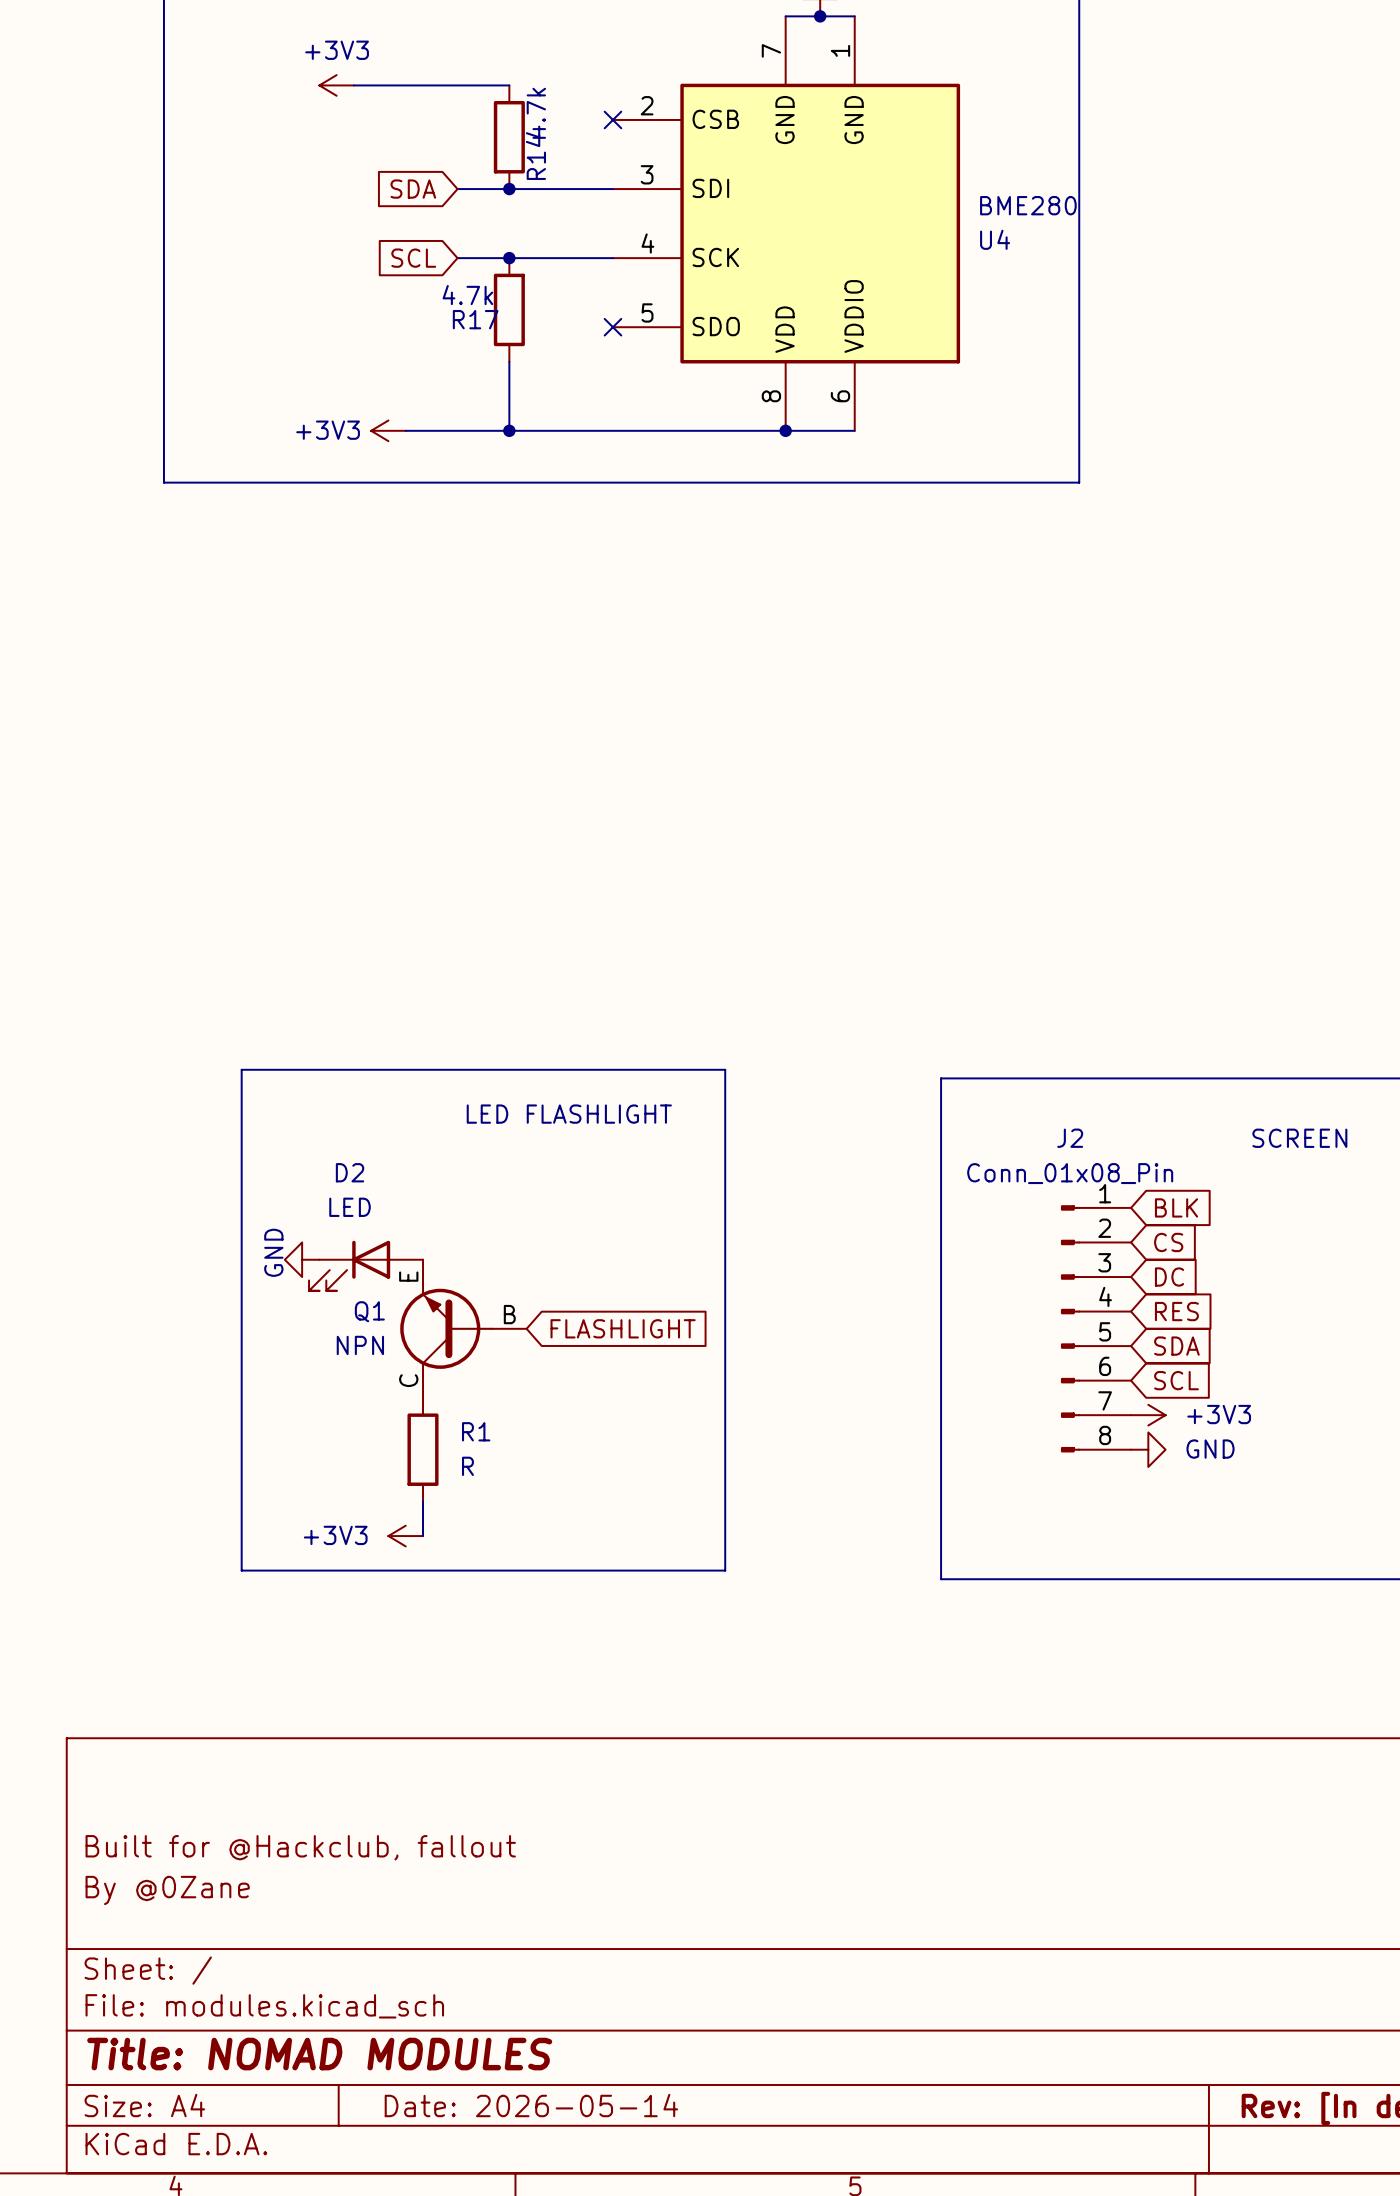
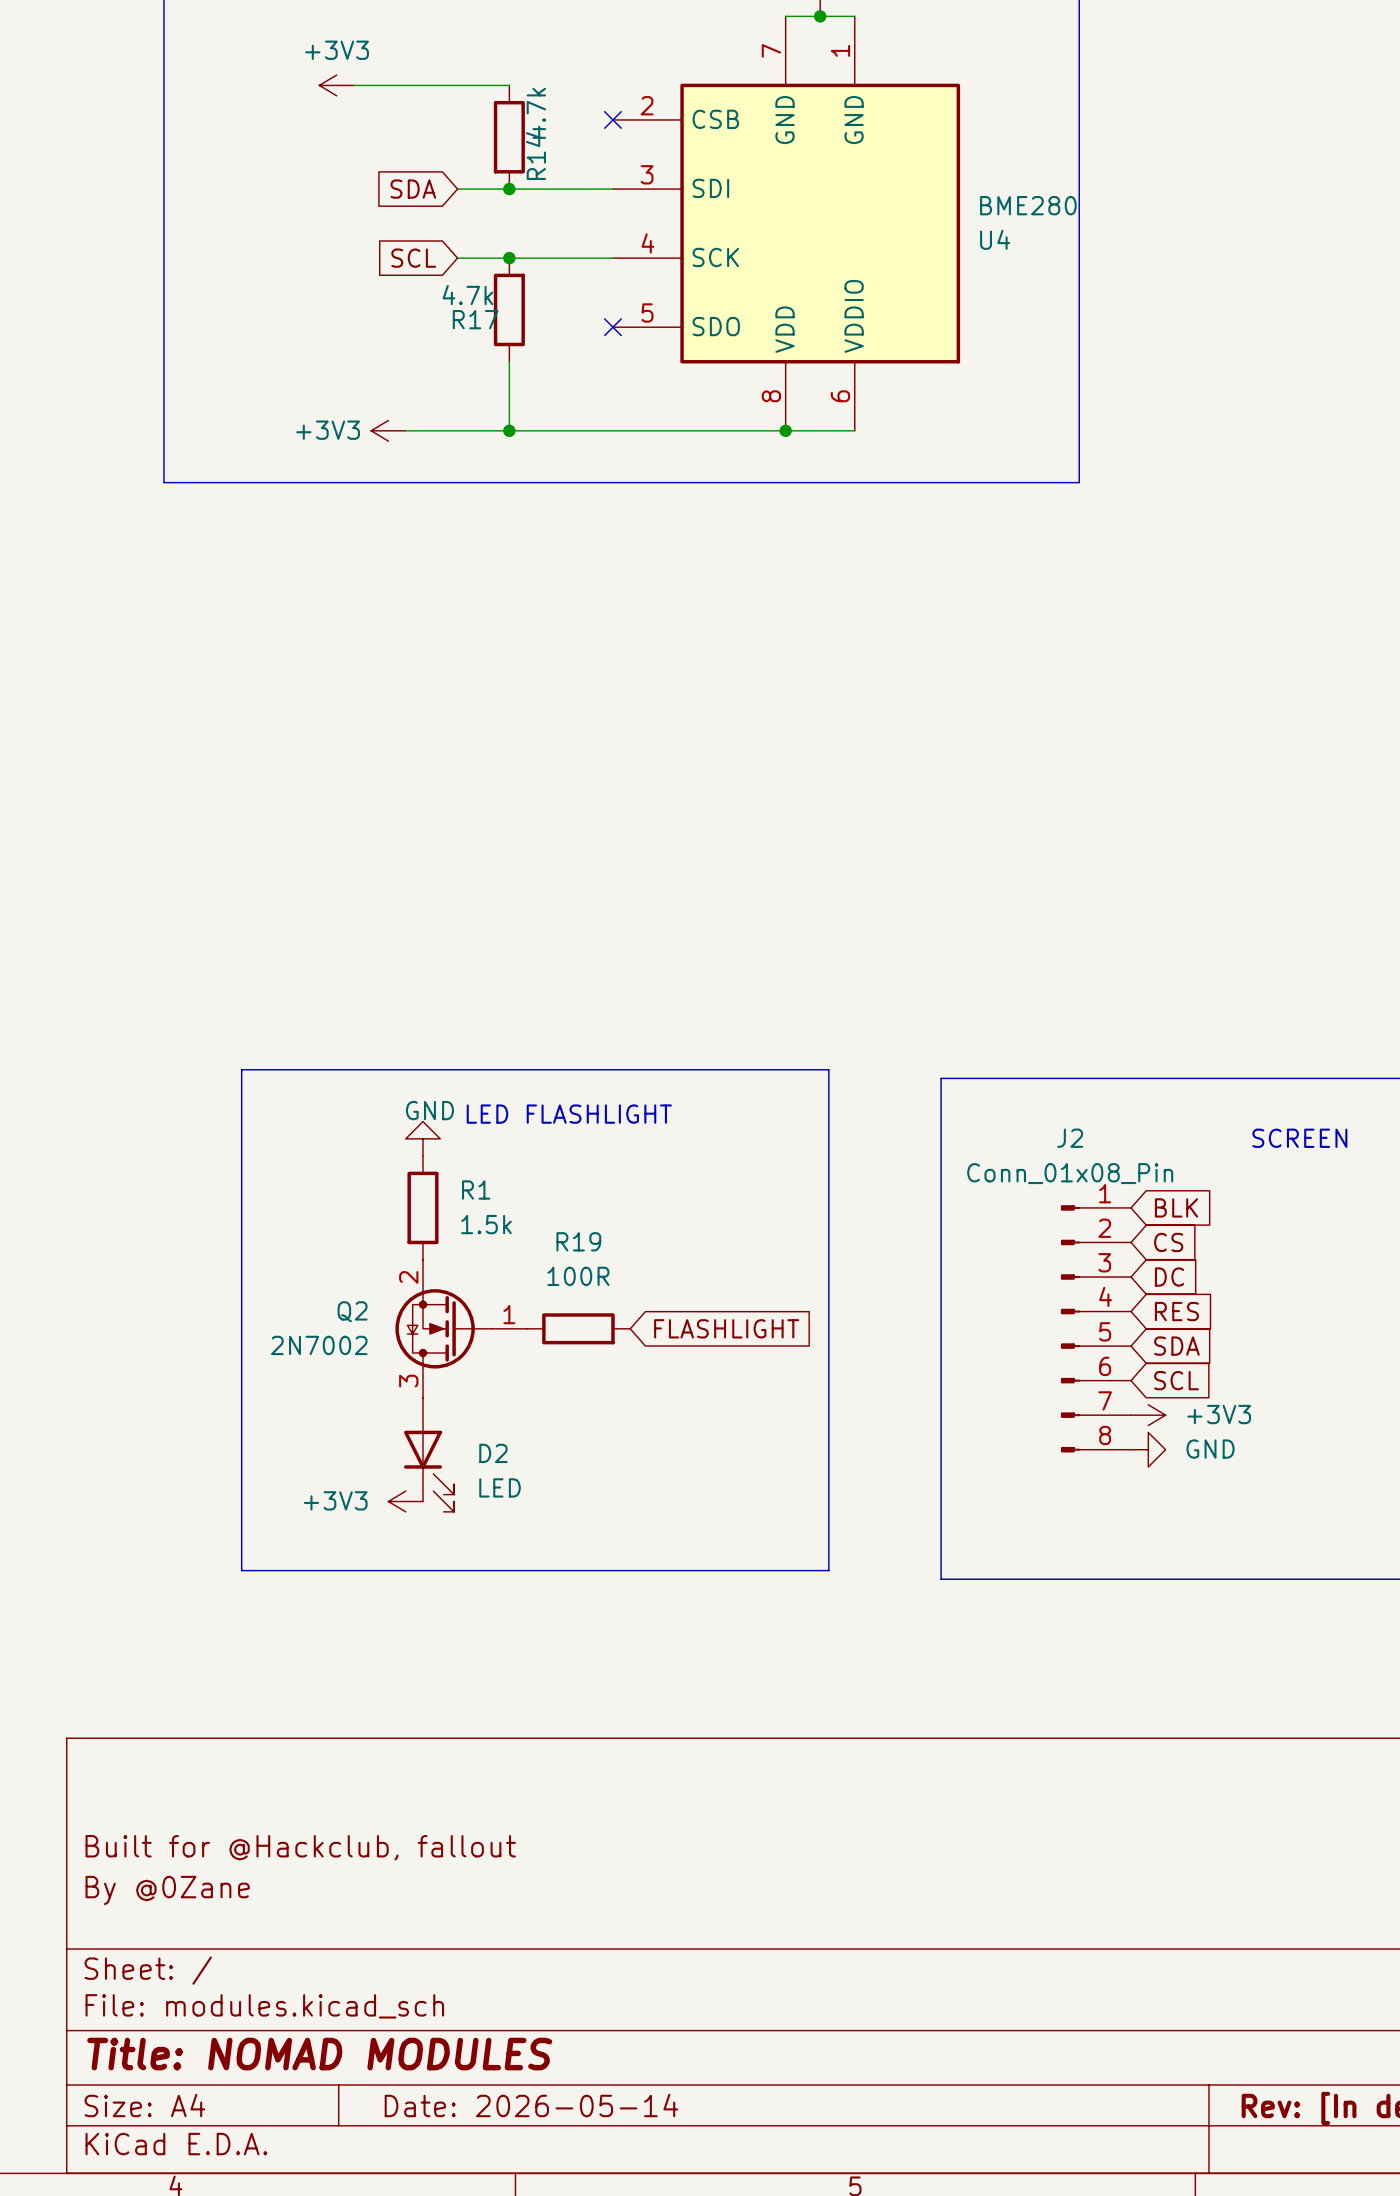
line: (725, 1069) (725, 1570) -> (725, 1069) (828, 1069) (828, 1570) (725, 1570)
D2 name position: D2 (350, 1172) -> D2 (493, 1453)
D2 value position: LED (350, 1207) -> LED (500, 1487)
power symbol rotation: 0° (302, 1259) -> 90° clockwise (423, 1138)
power symbol position: GND (302, 1259) -> GND (423, 1138)
D2 rotation: 0° (349, 1265) -> 90° counterclockwise (429, 1471)
D2 position: (366, 1265) -> (429, 1454)
Q2: none -> 2N7002 (461, 1328)
Q1: NPN (463, 1328) -> none
R19: none -> 100R (578, 1328)
global label position: FLASHLIGHT (623, 1328) -> FLASHLIGHT (726, 1328)
R1 position: (423, 1449) -> (423, 1207)
R1 value: R (467, 1466) -> 1.5k (486, 1224)
wire: (423, 1501) (423, 1536) -> none
power symbol position: +3V3 (405, 1536) -> +3V3 (405, 1501)

